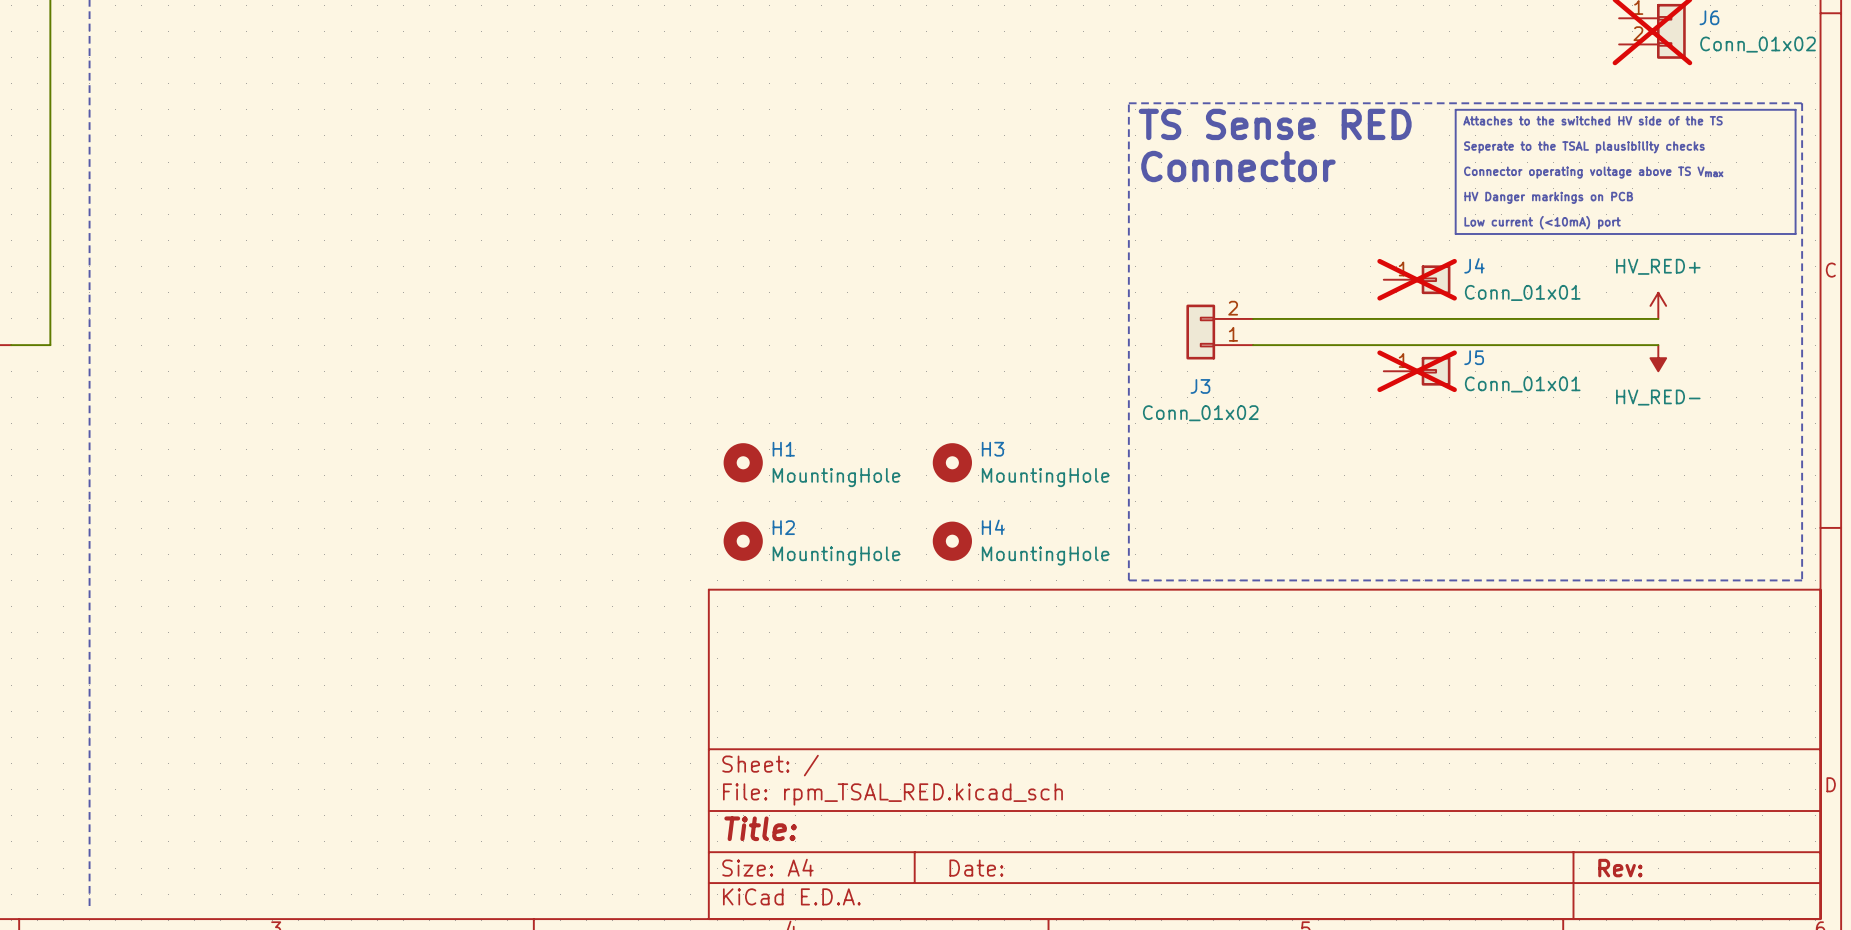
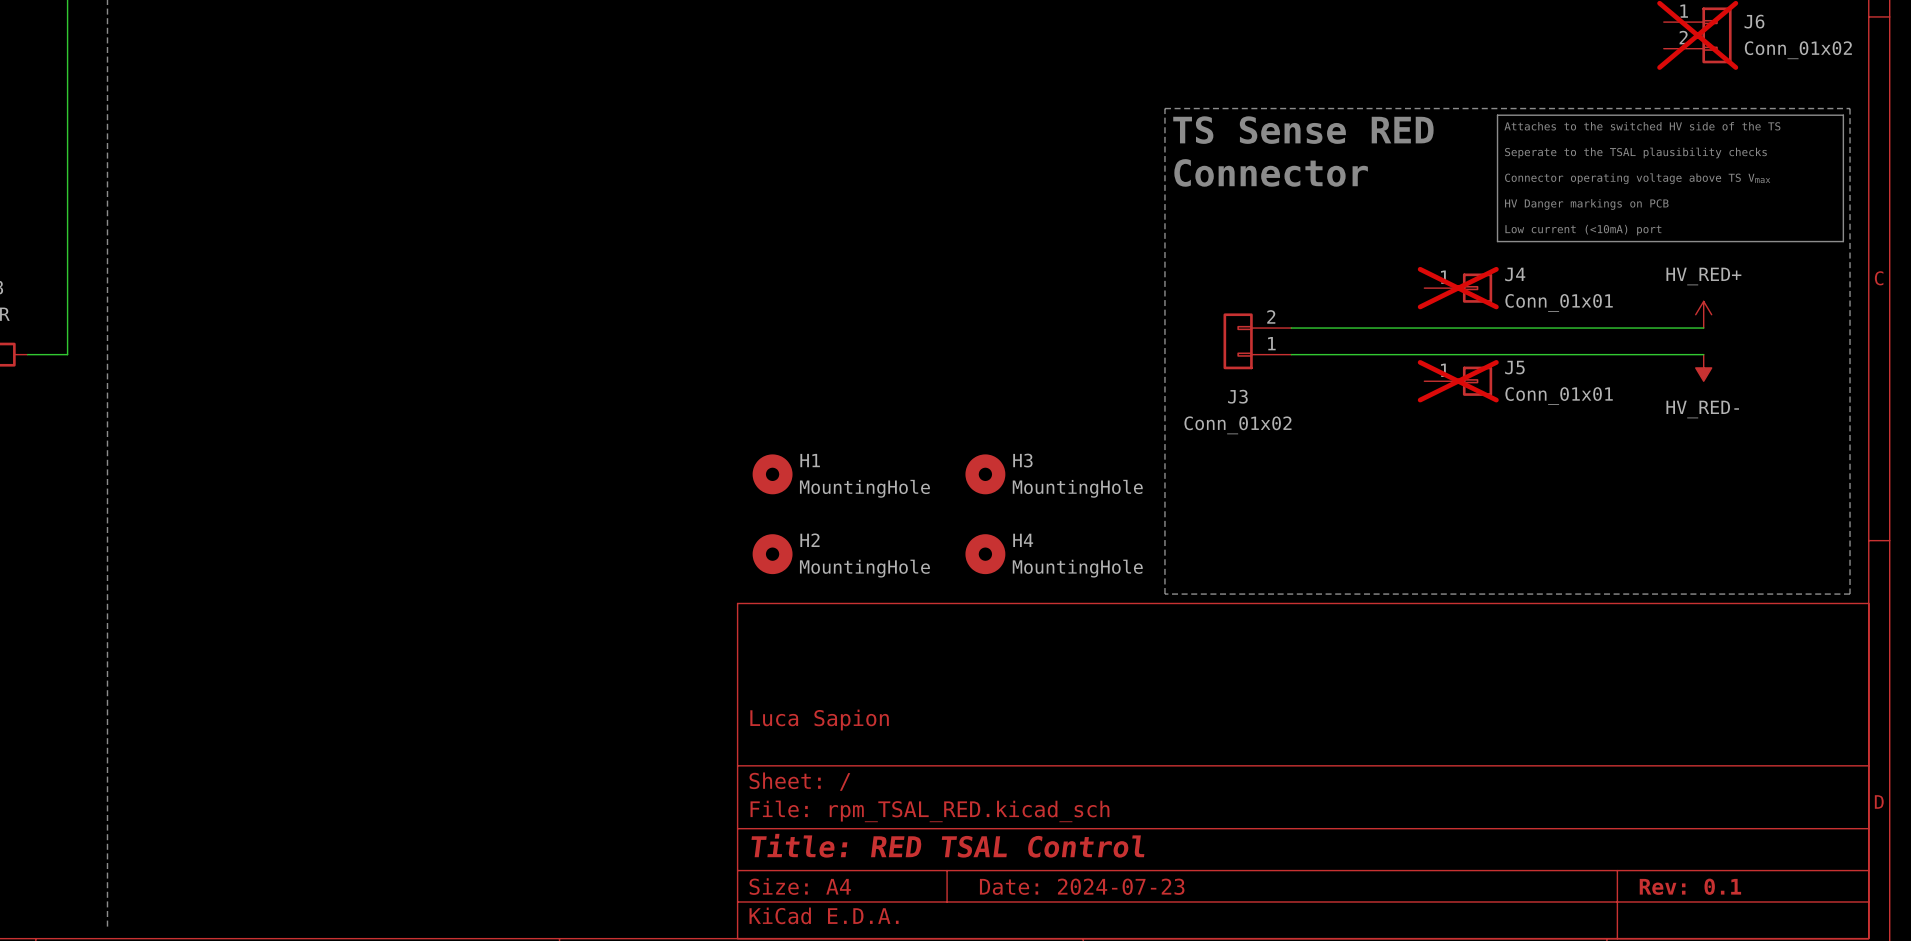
title block: none -> Luca Sapion (819, 720)
title block: Title: (760, 828) -> Title: RED TSAL Control (947, 845)
title block: Date: (976, 868) -> Date: 2024-07-23 (1082, 886)
title block: Rev: (1620, 868) -> Rev: 0.1 (1690, 886)

